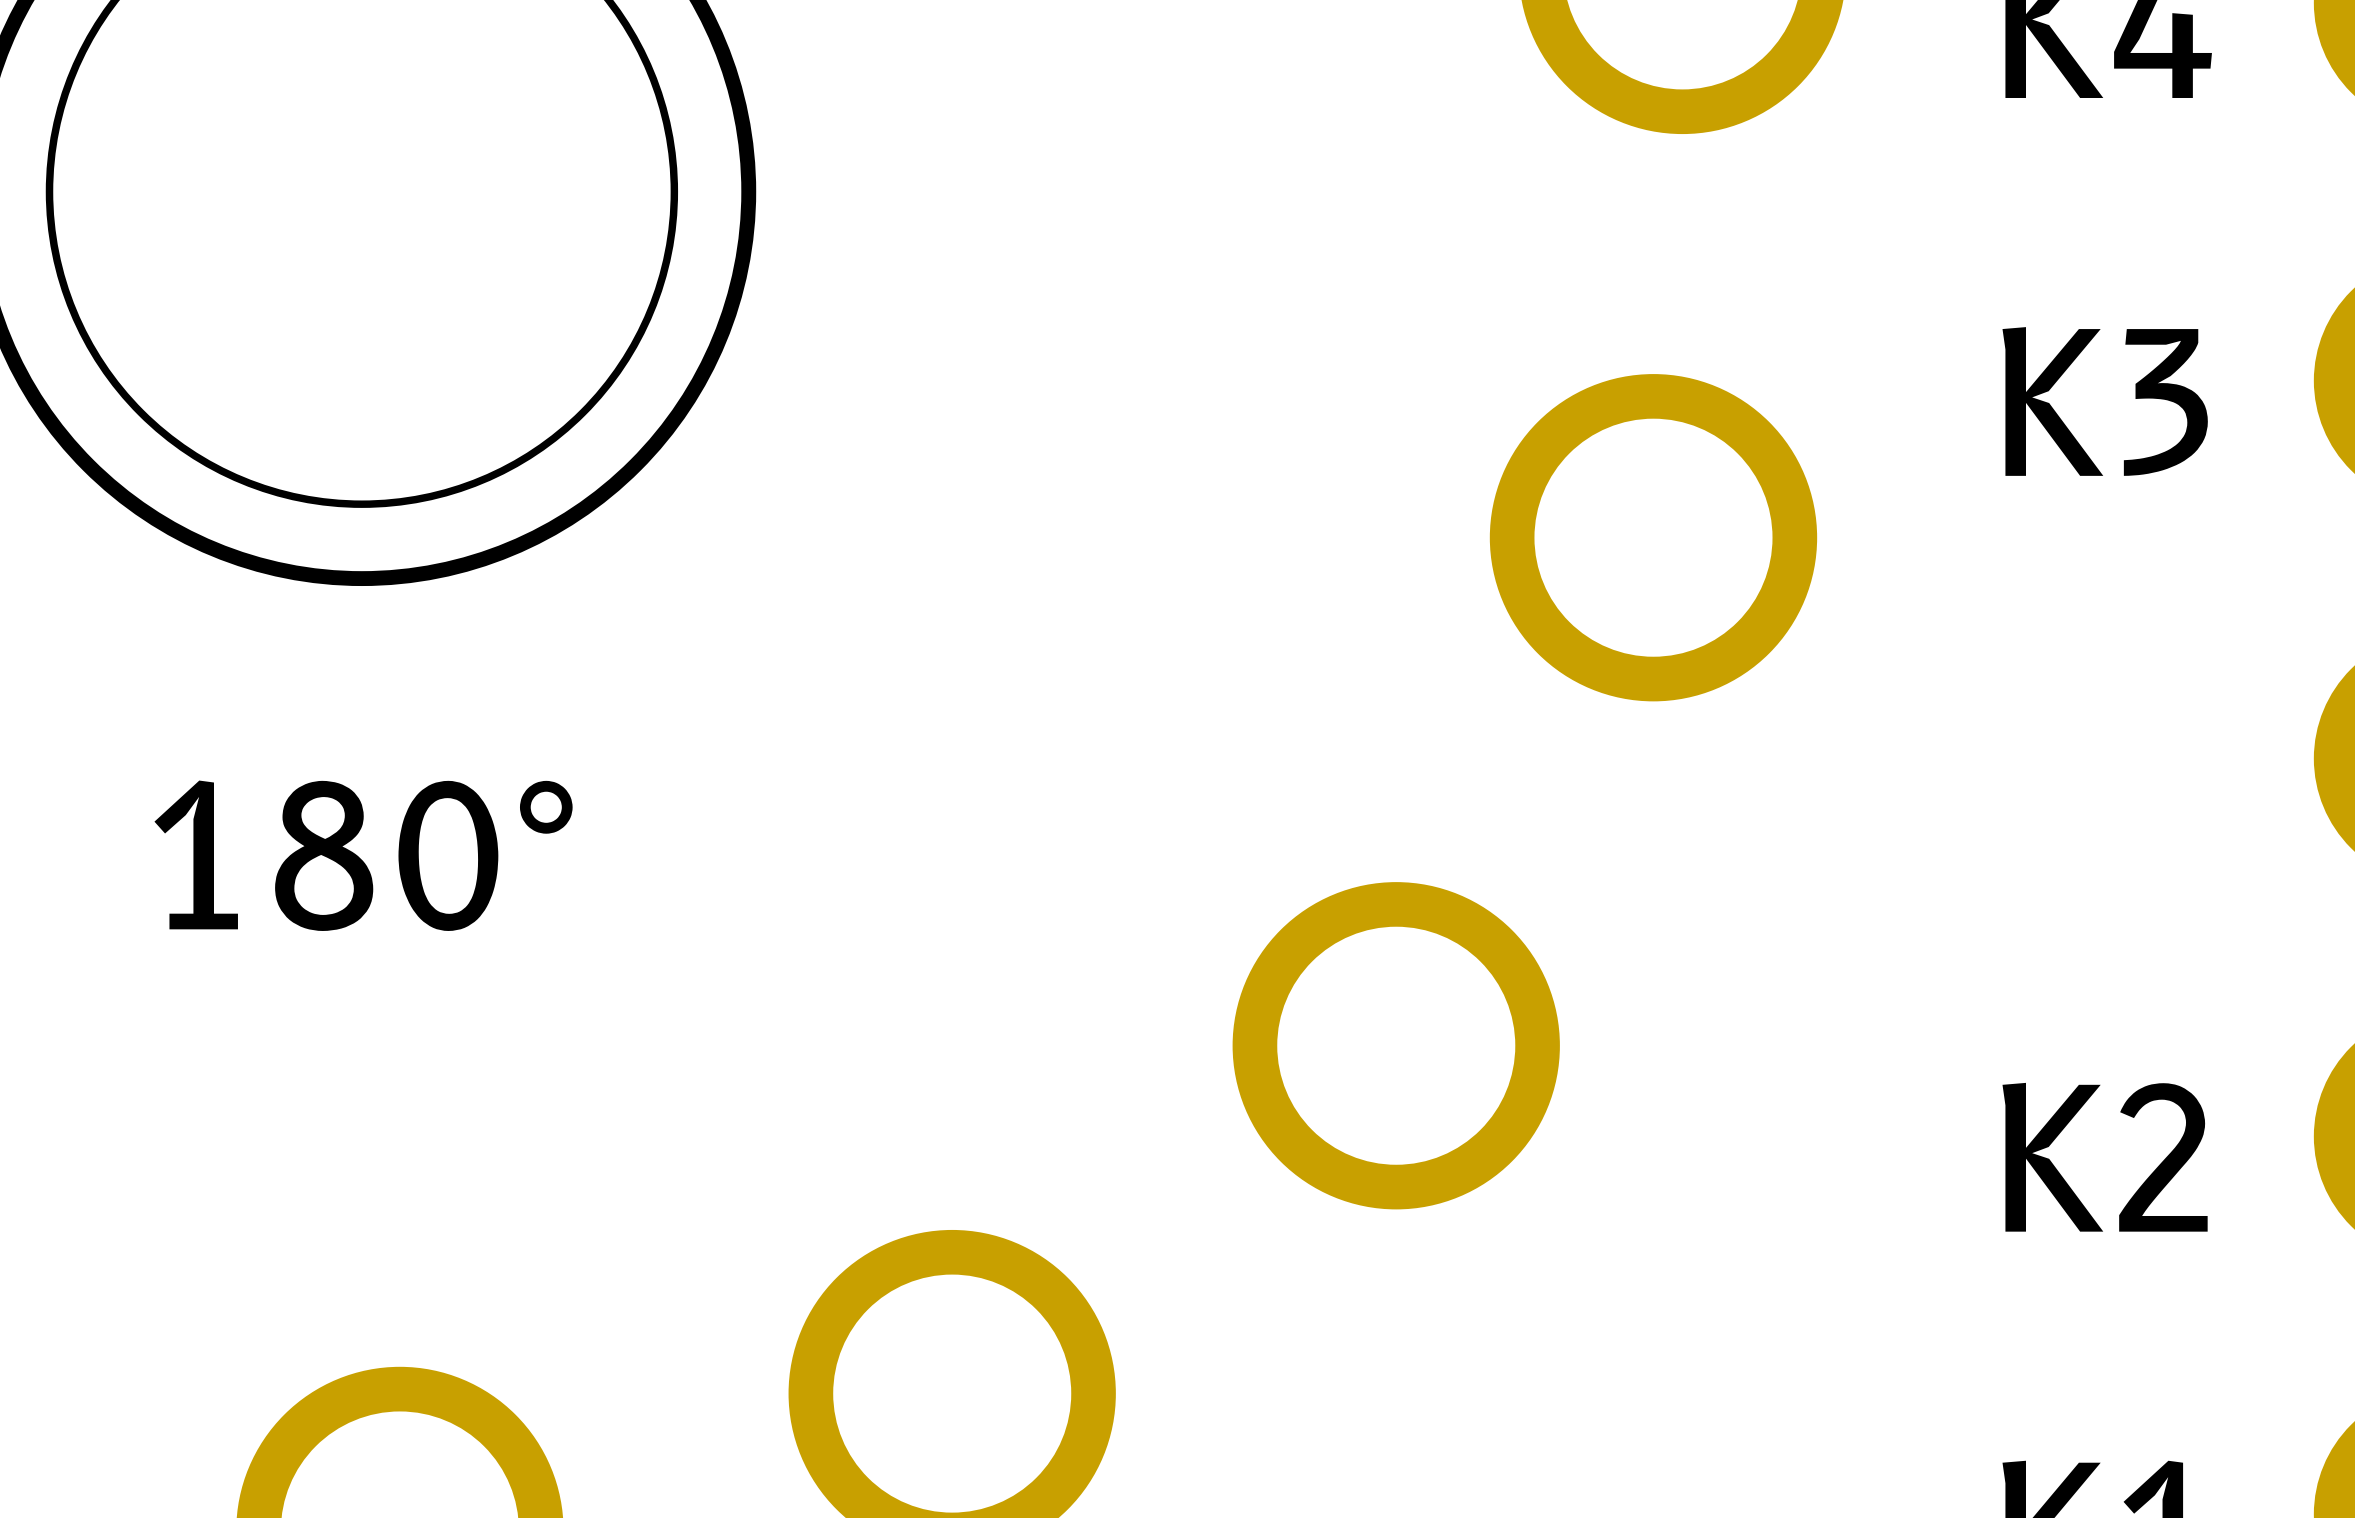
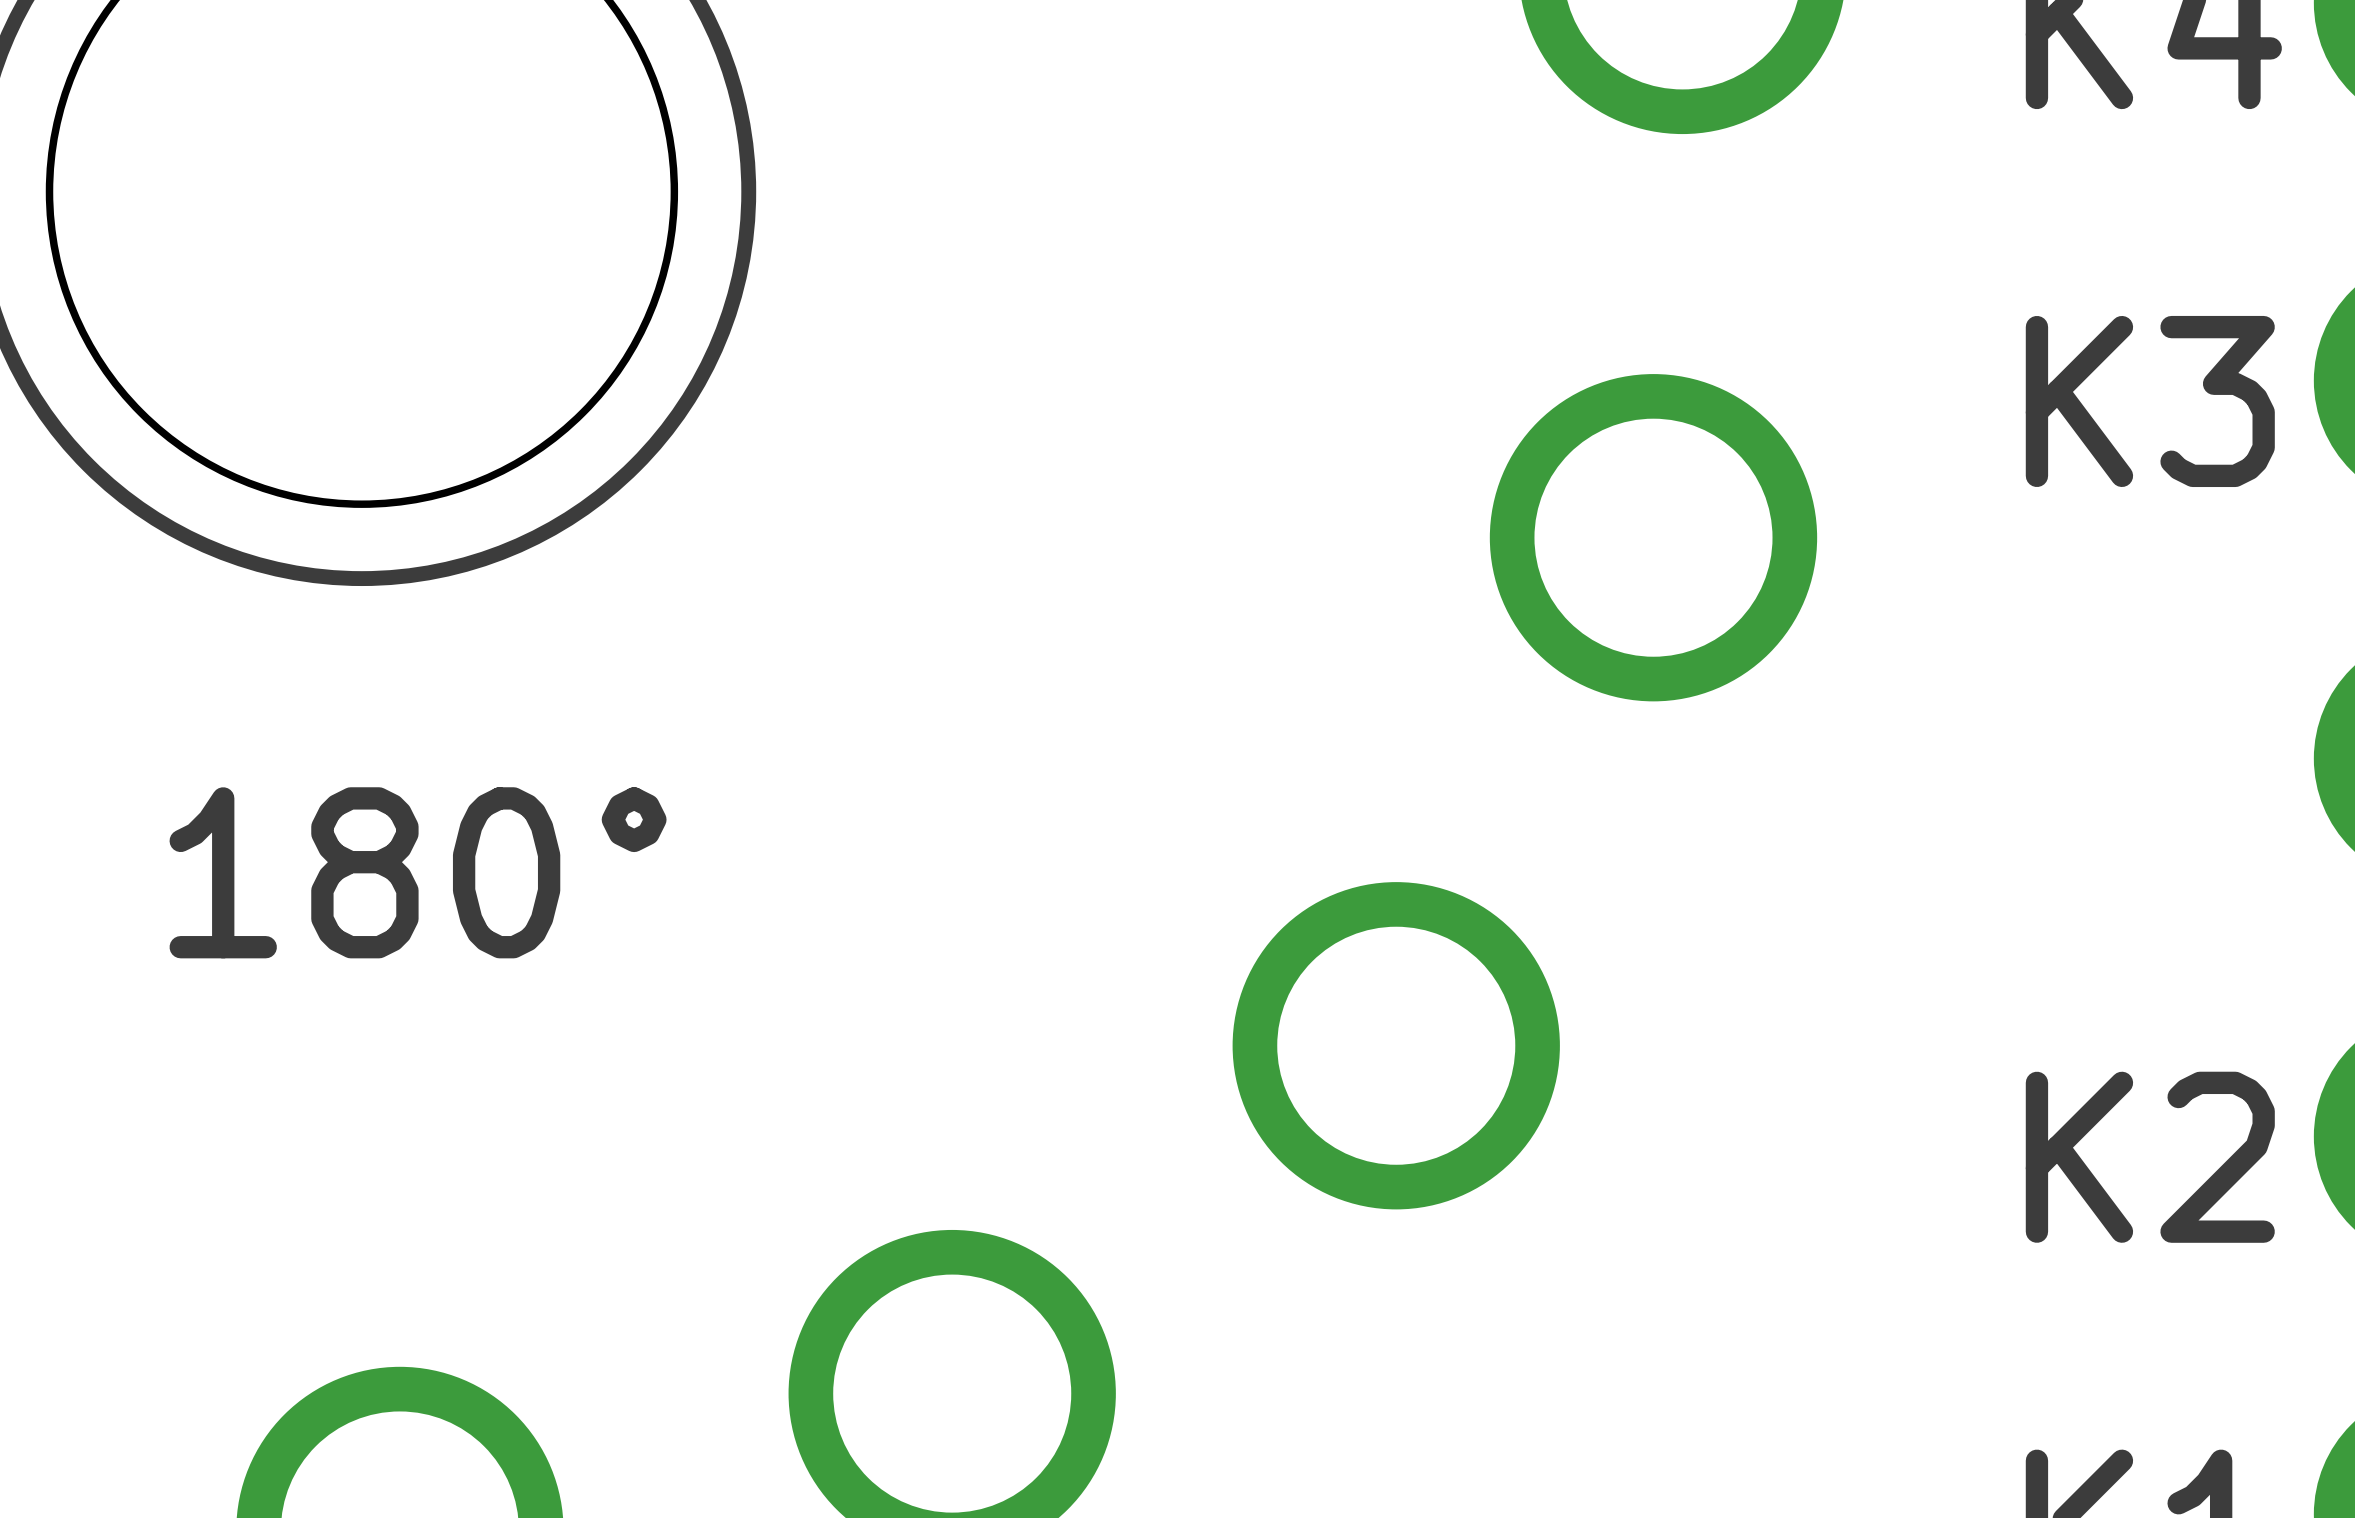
text position: 180° (363, 855) -> 180° (418, 872)

